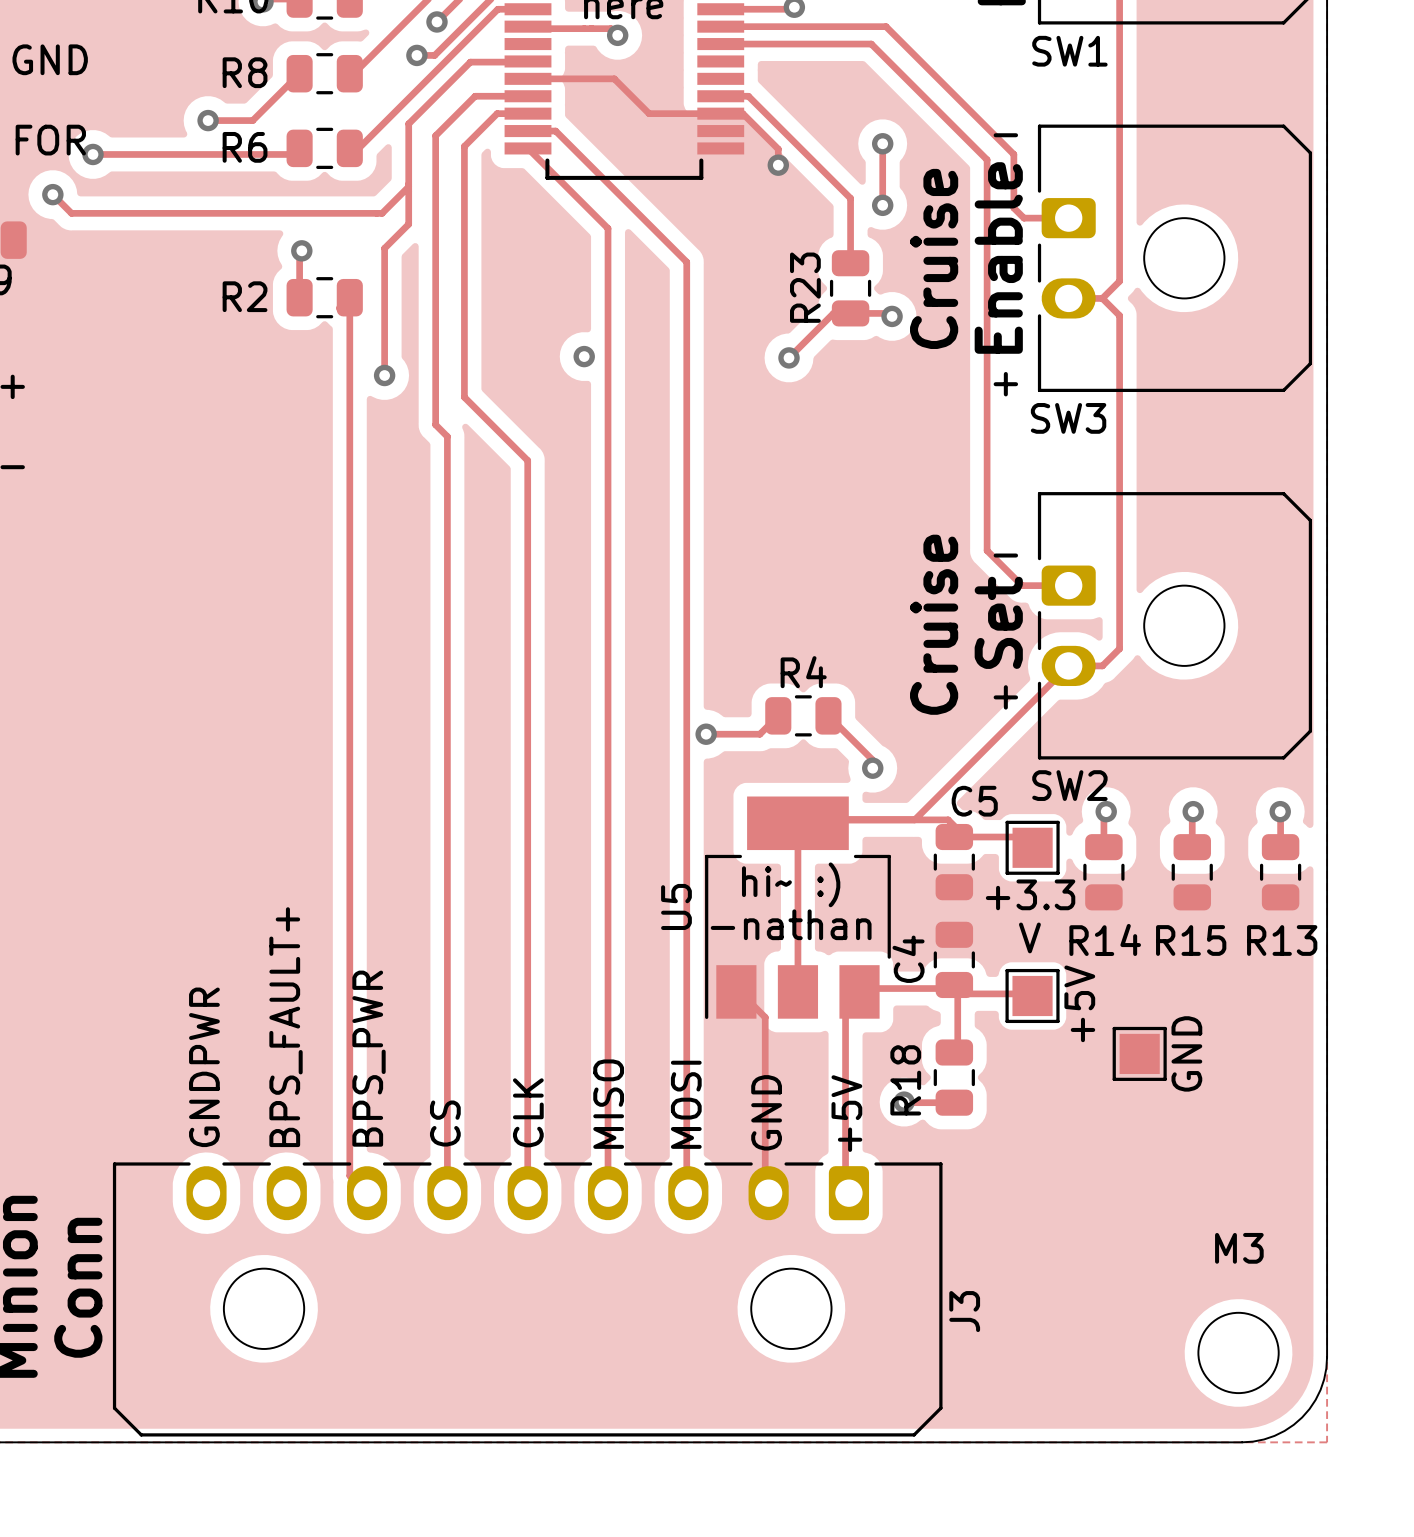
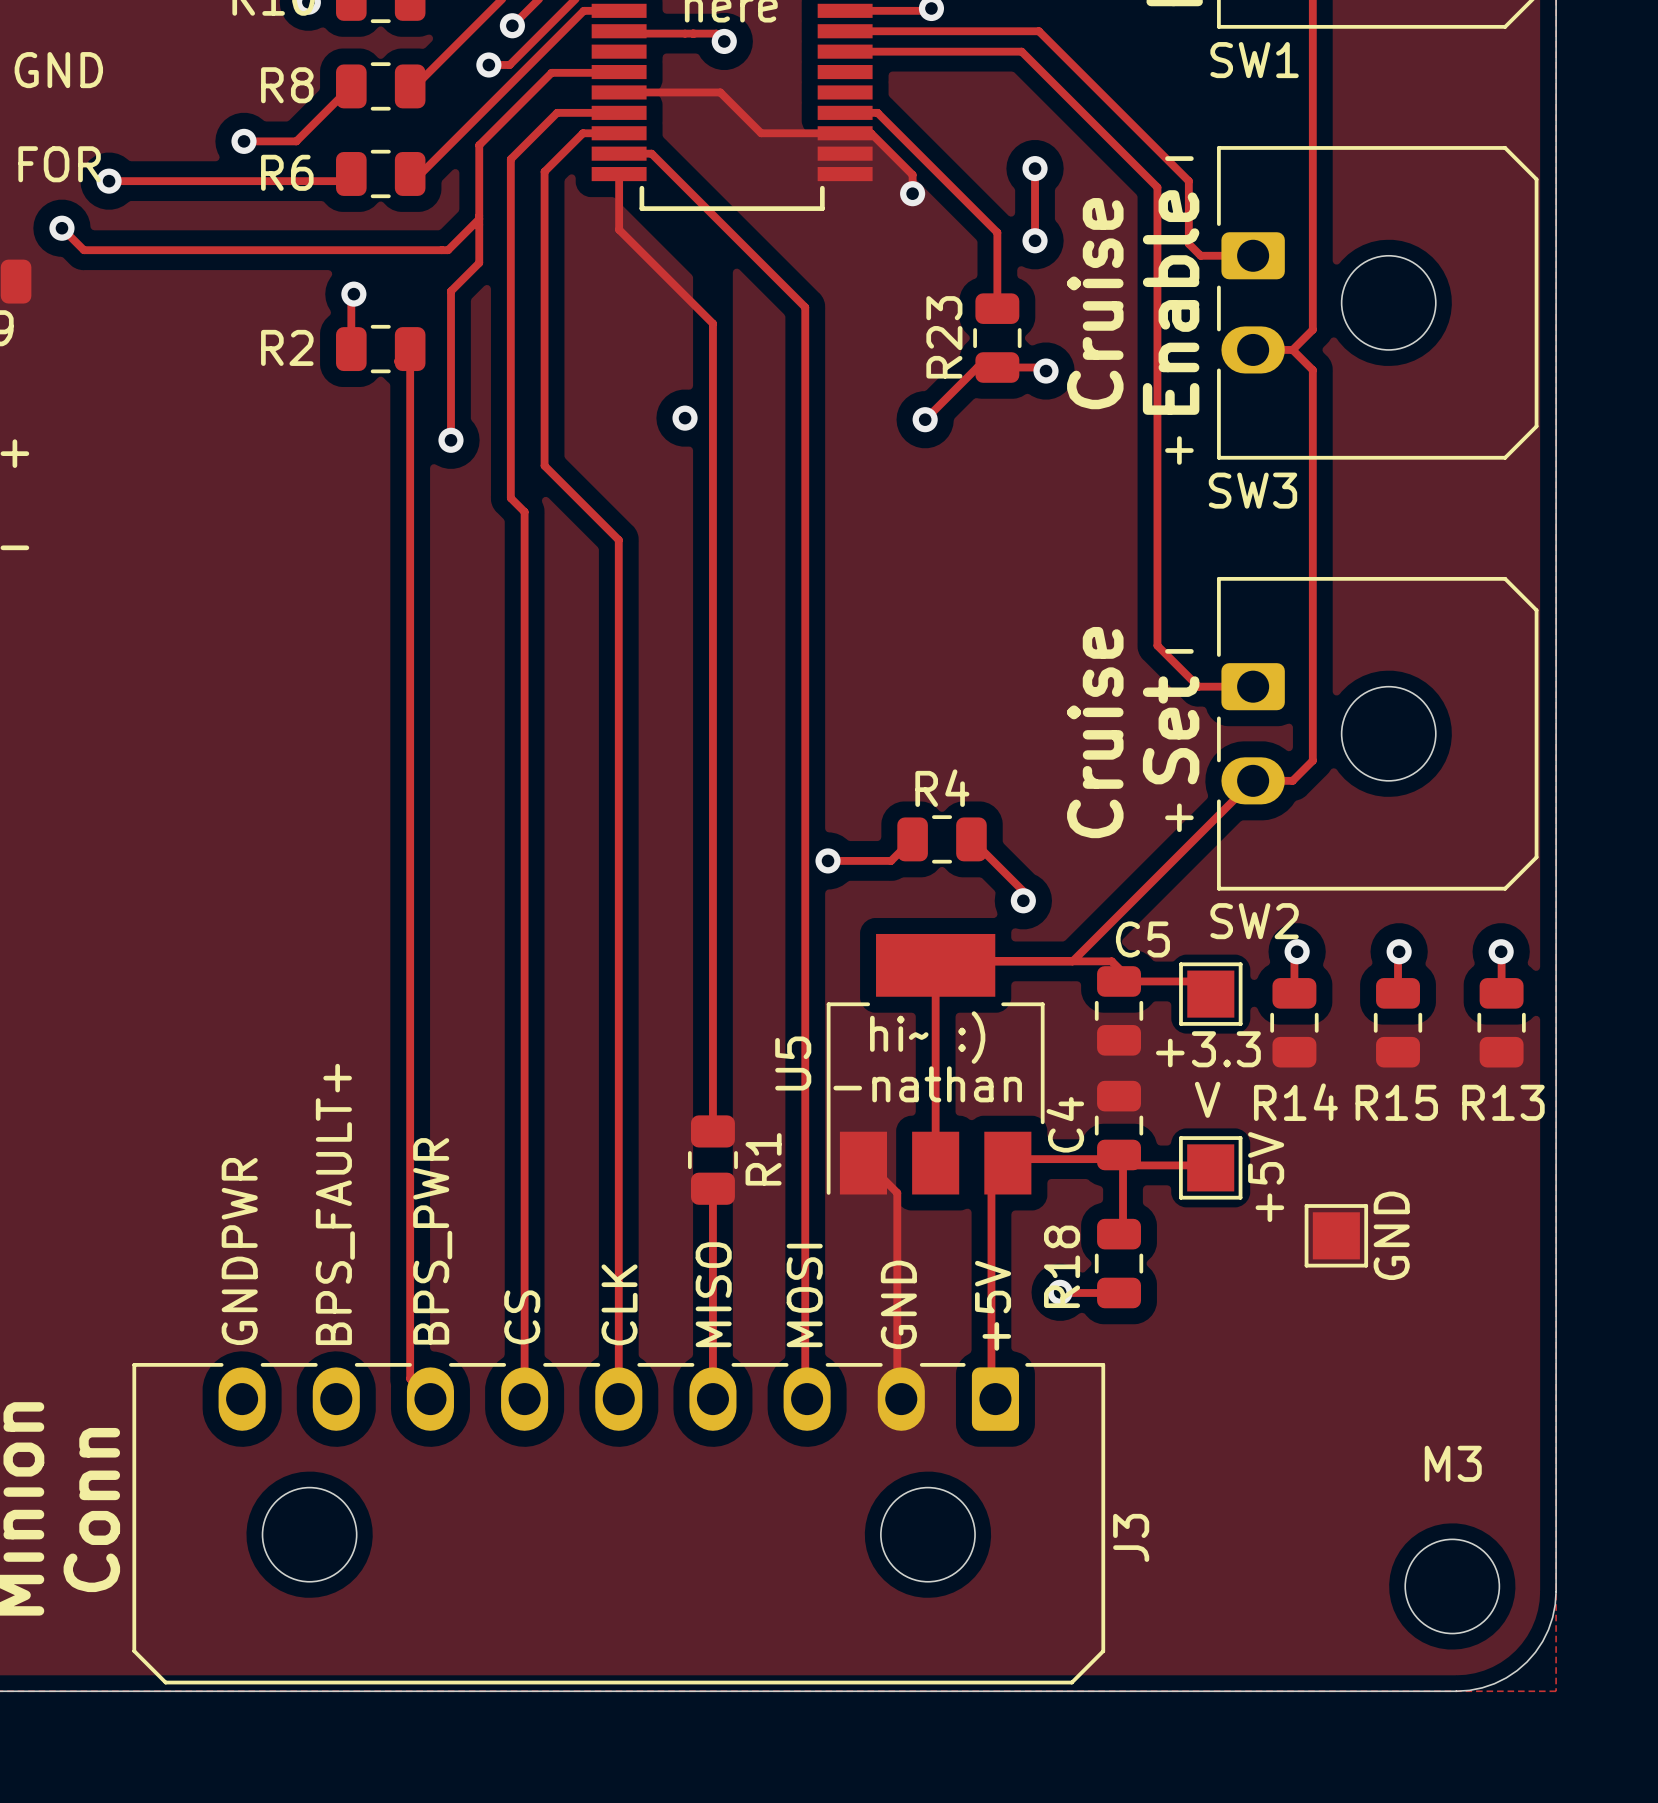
track: (528, 148) (608, 228) (608, 275) -> (619, 174) (619, 229) (712, 323)
track: (608, 964) (608, 1013) -> none
R1: none -> (712, 1160)

